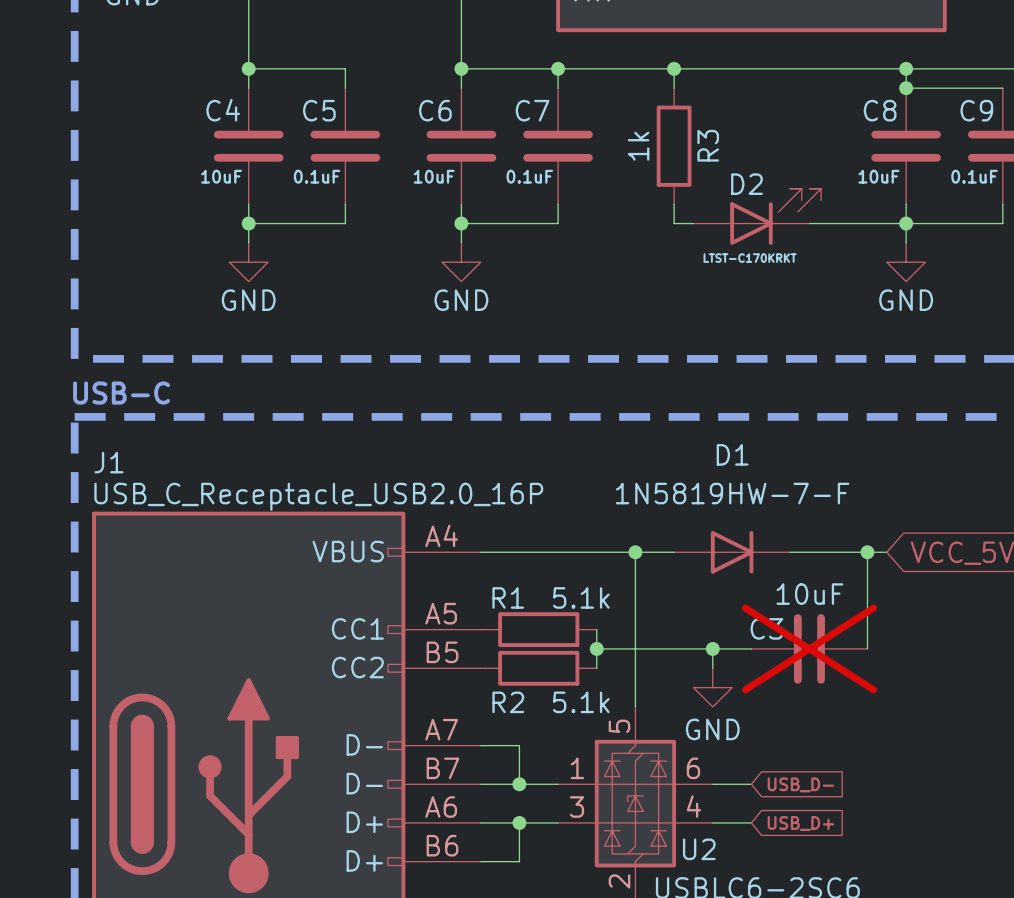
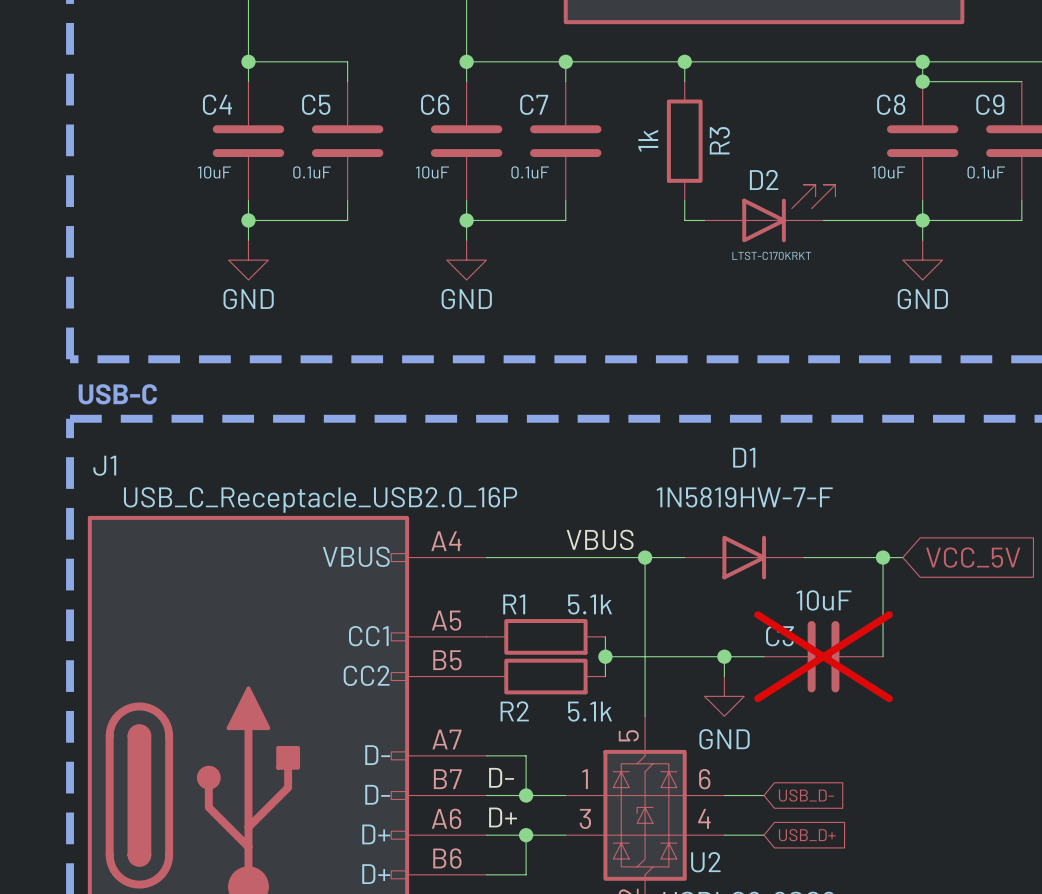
label: none -> VBUS (600, 539)
label: none -> D- (501, 777)
label: none -> D+ (503, 817)

